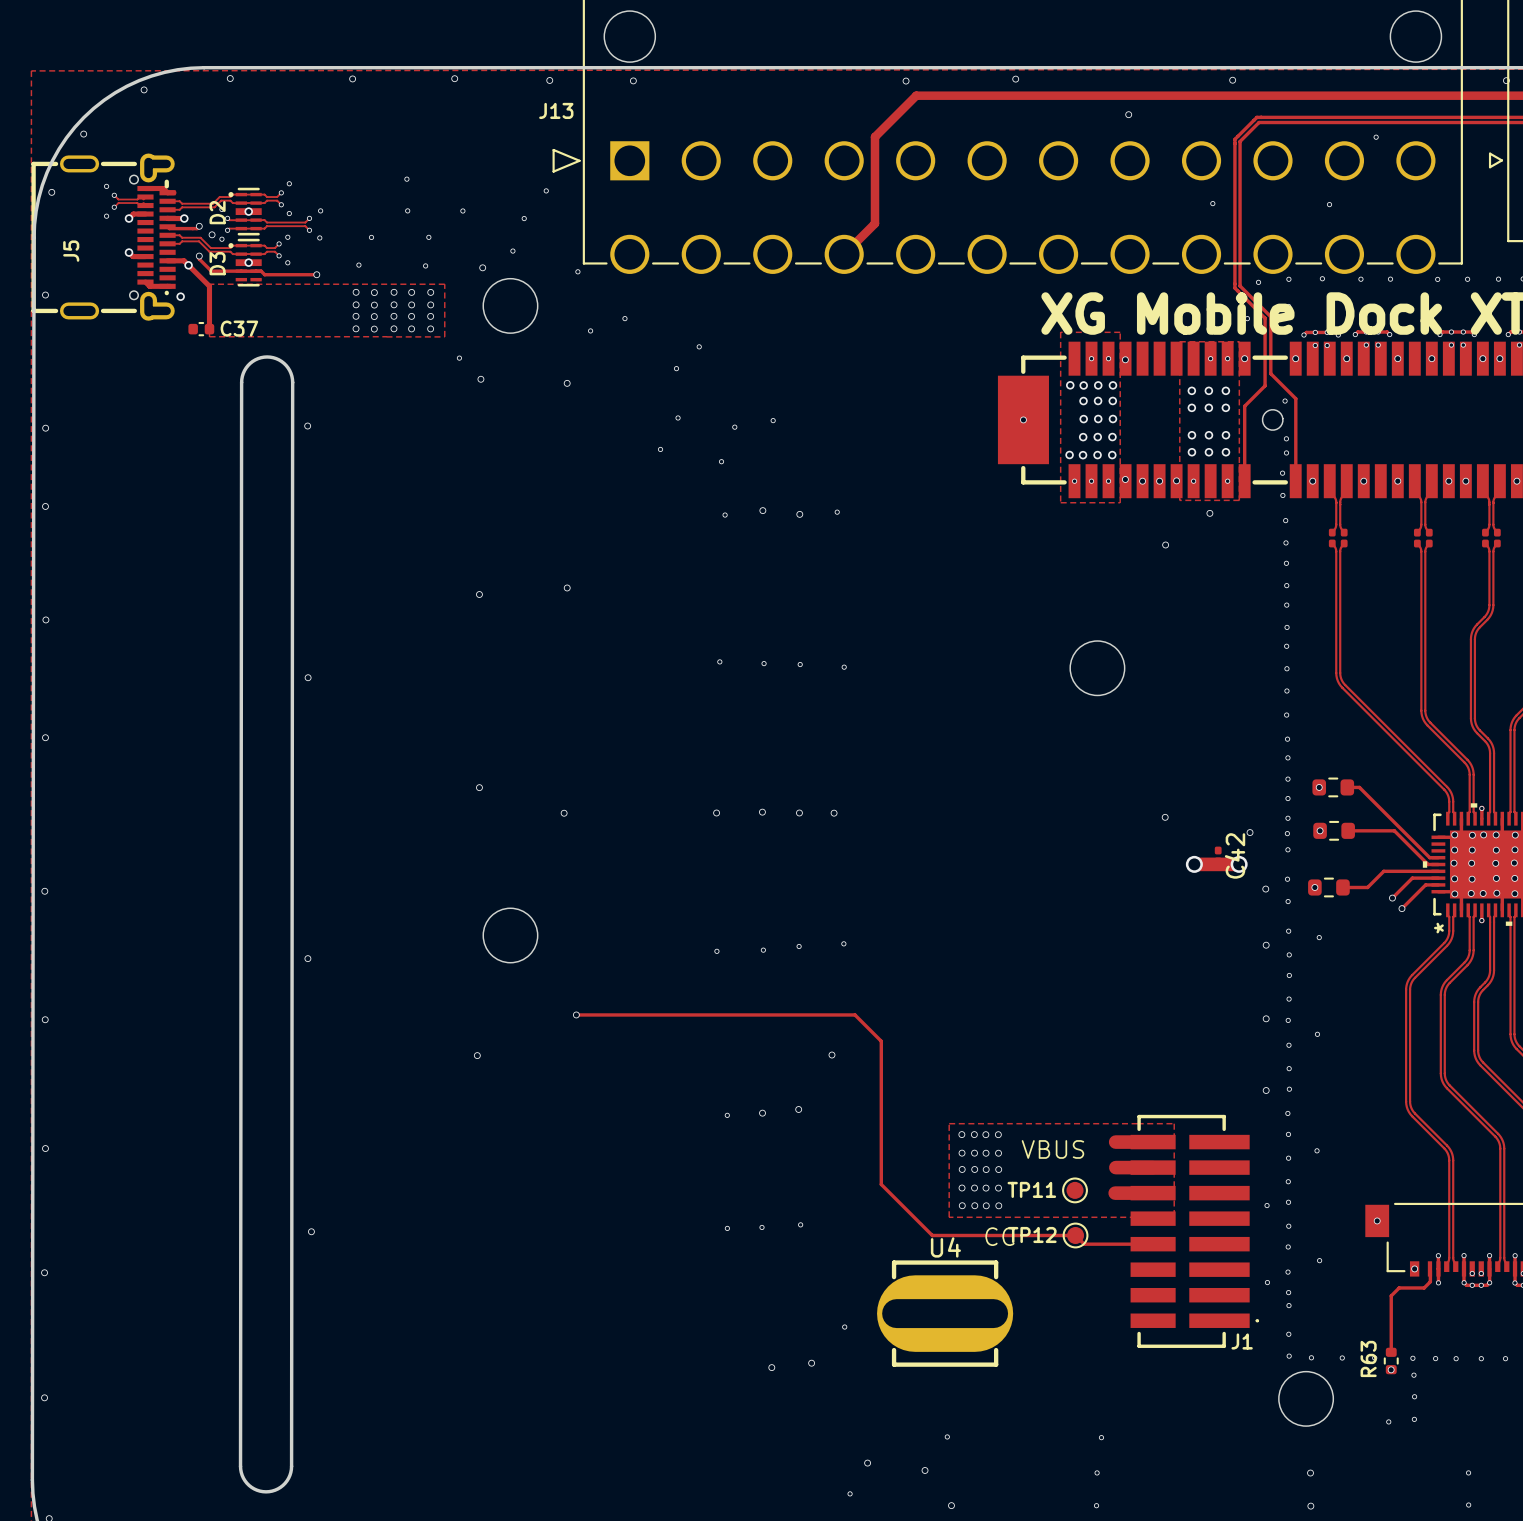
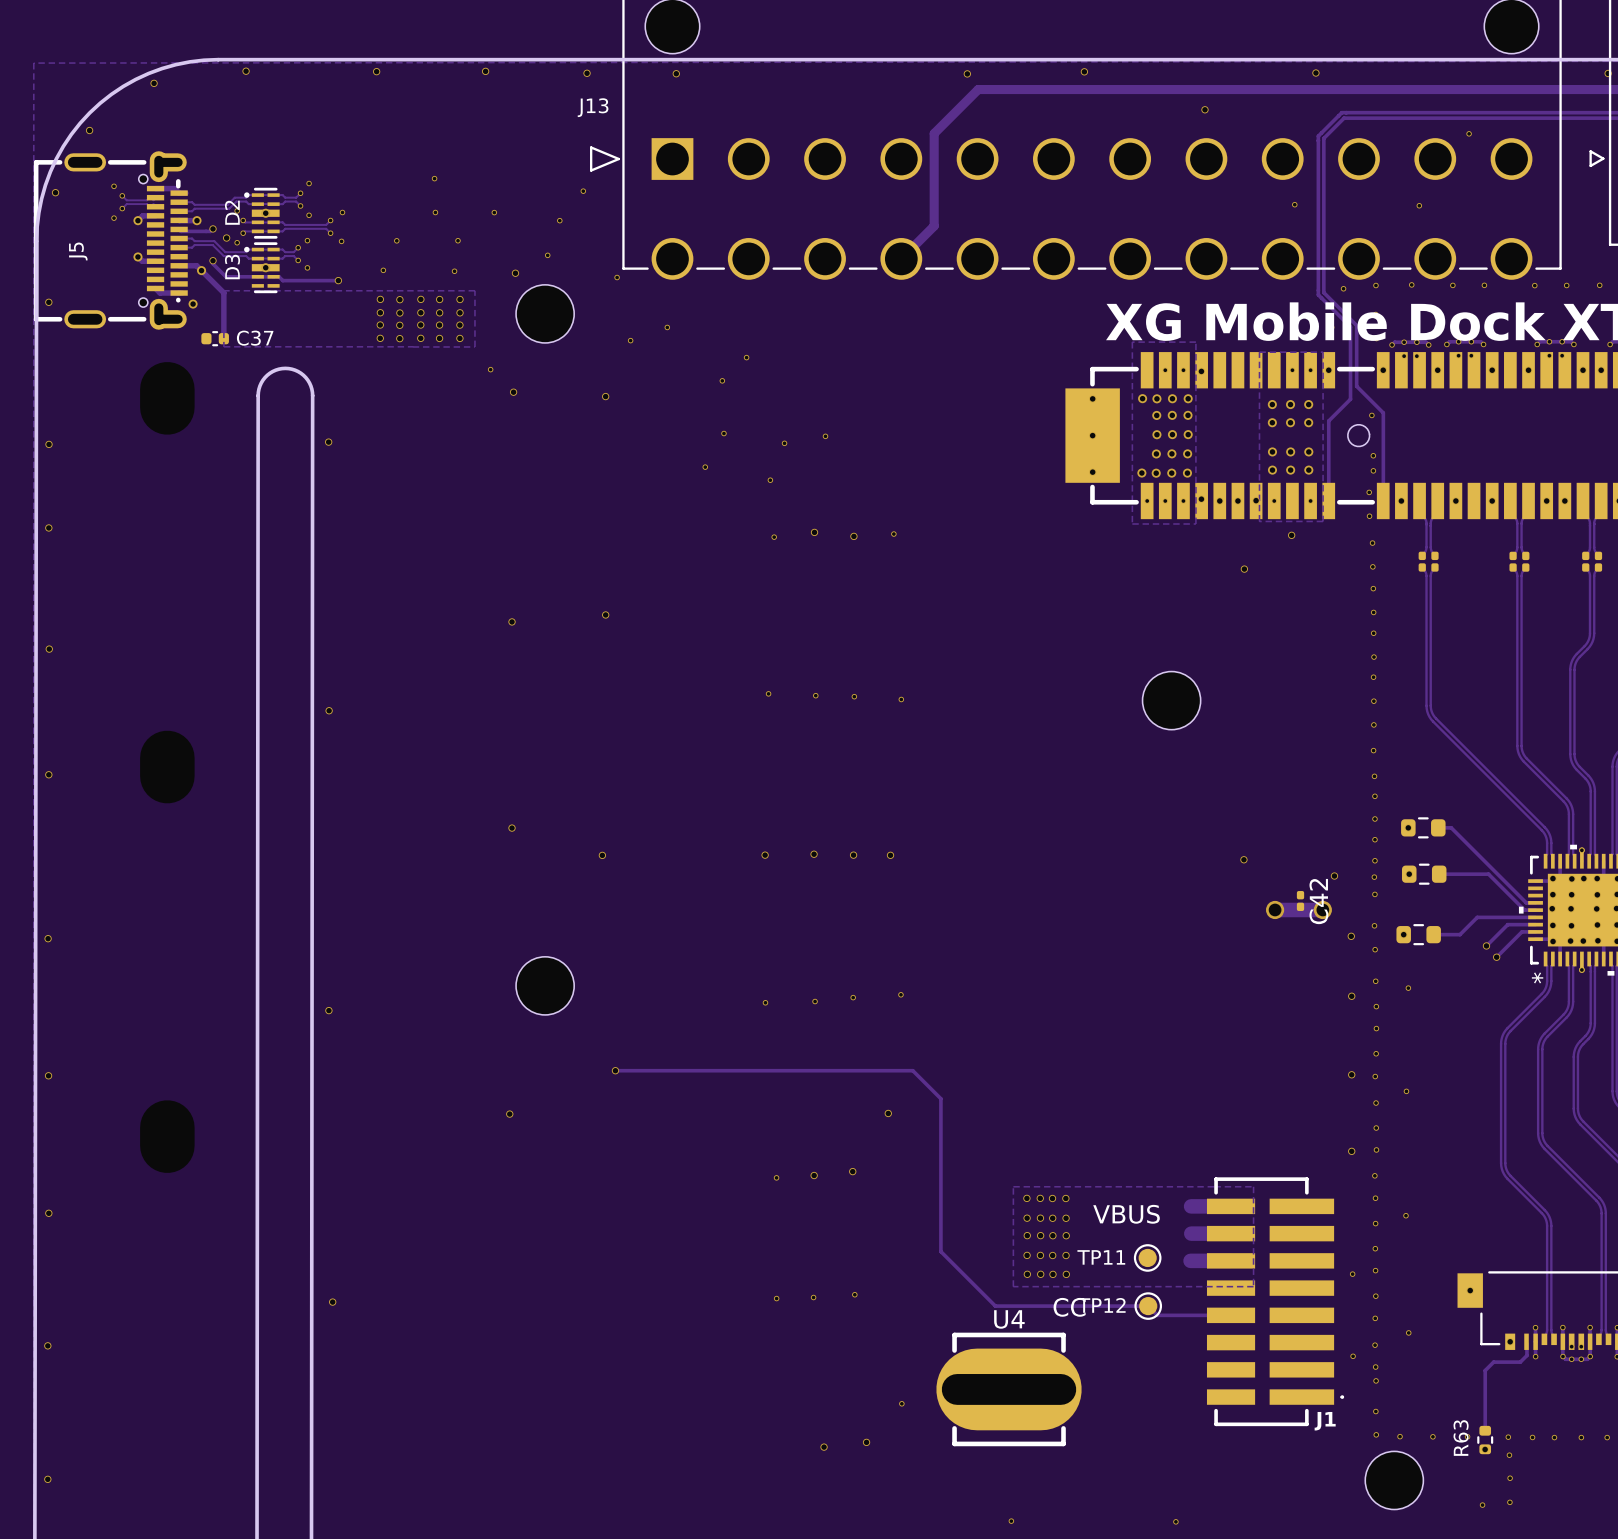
via: none -> (1092, 398)
via: none -> (1092, 472)

